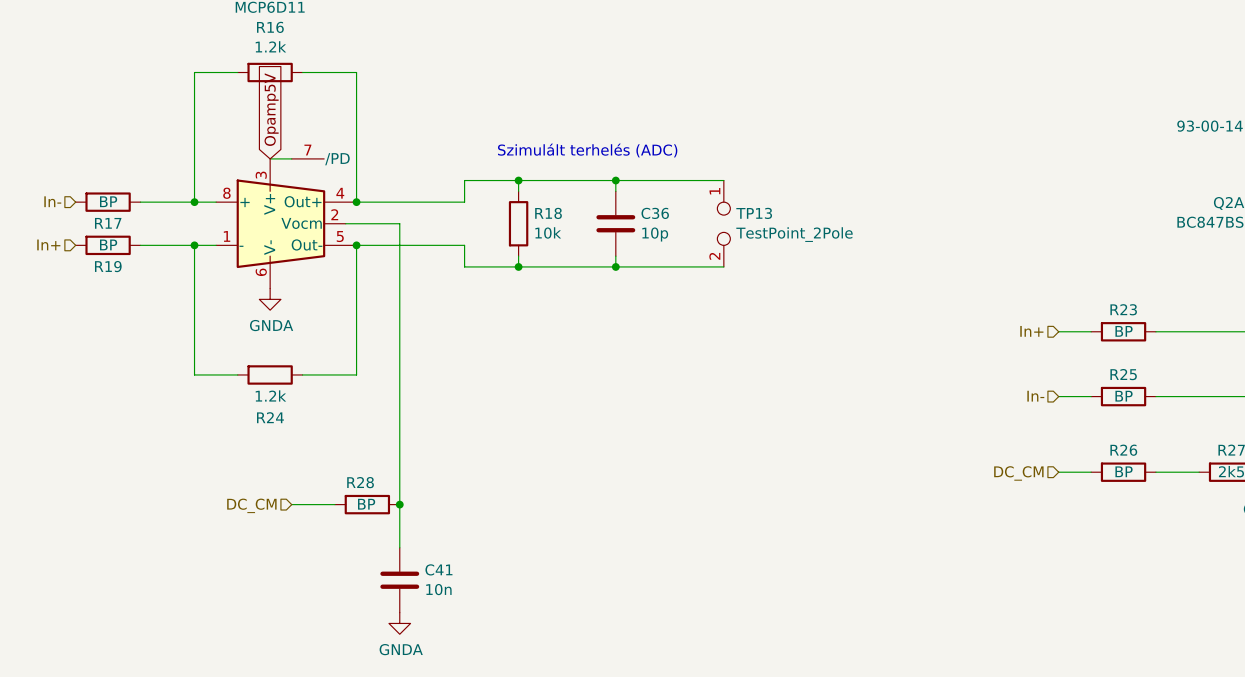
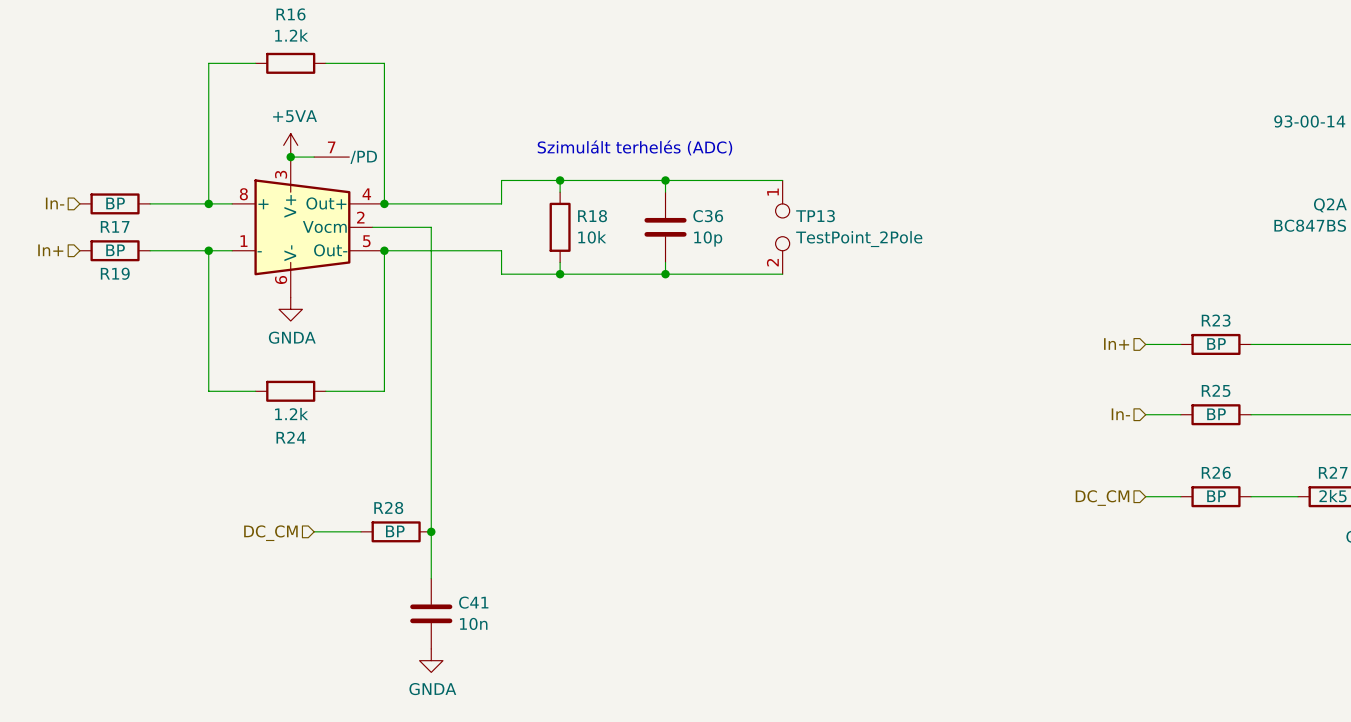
global label: Opamp5V (271, 109) -> none
power symbol: none -> +5VA (290, 145)
junction: none -> (290, 157)

